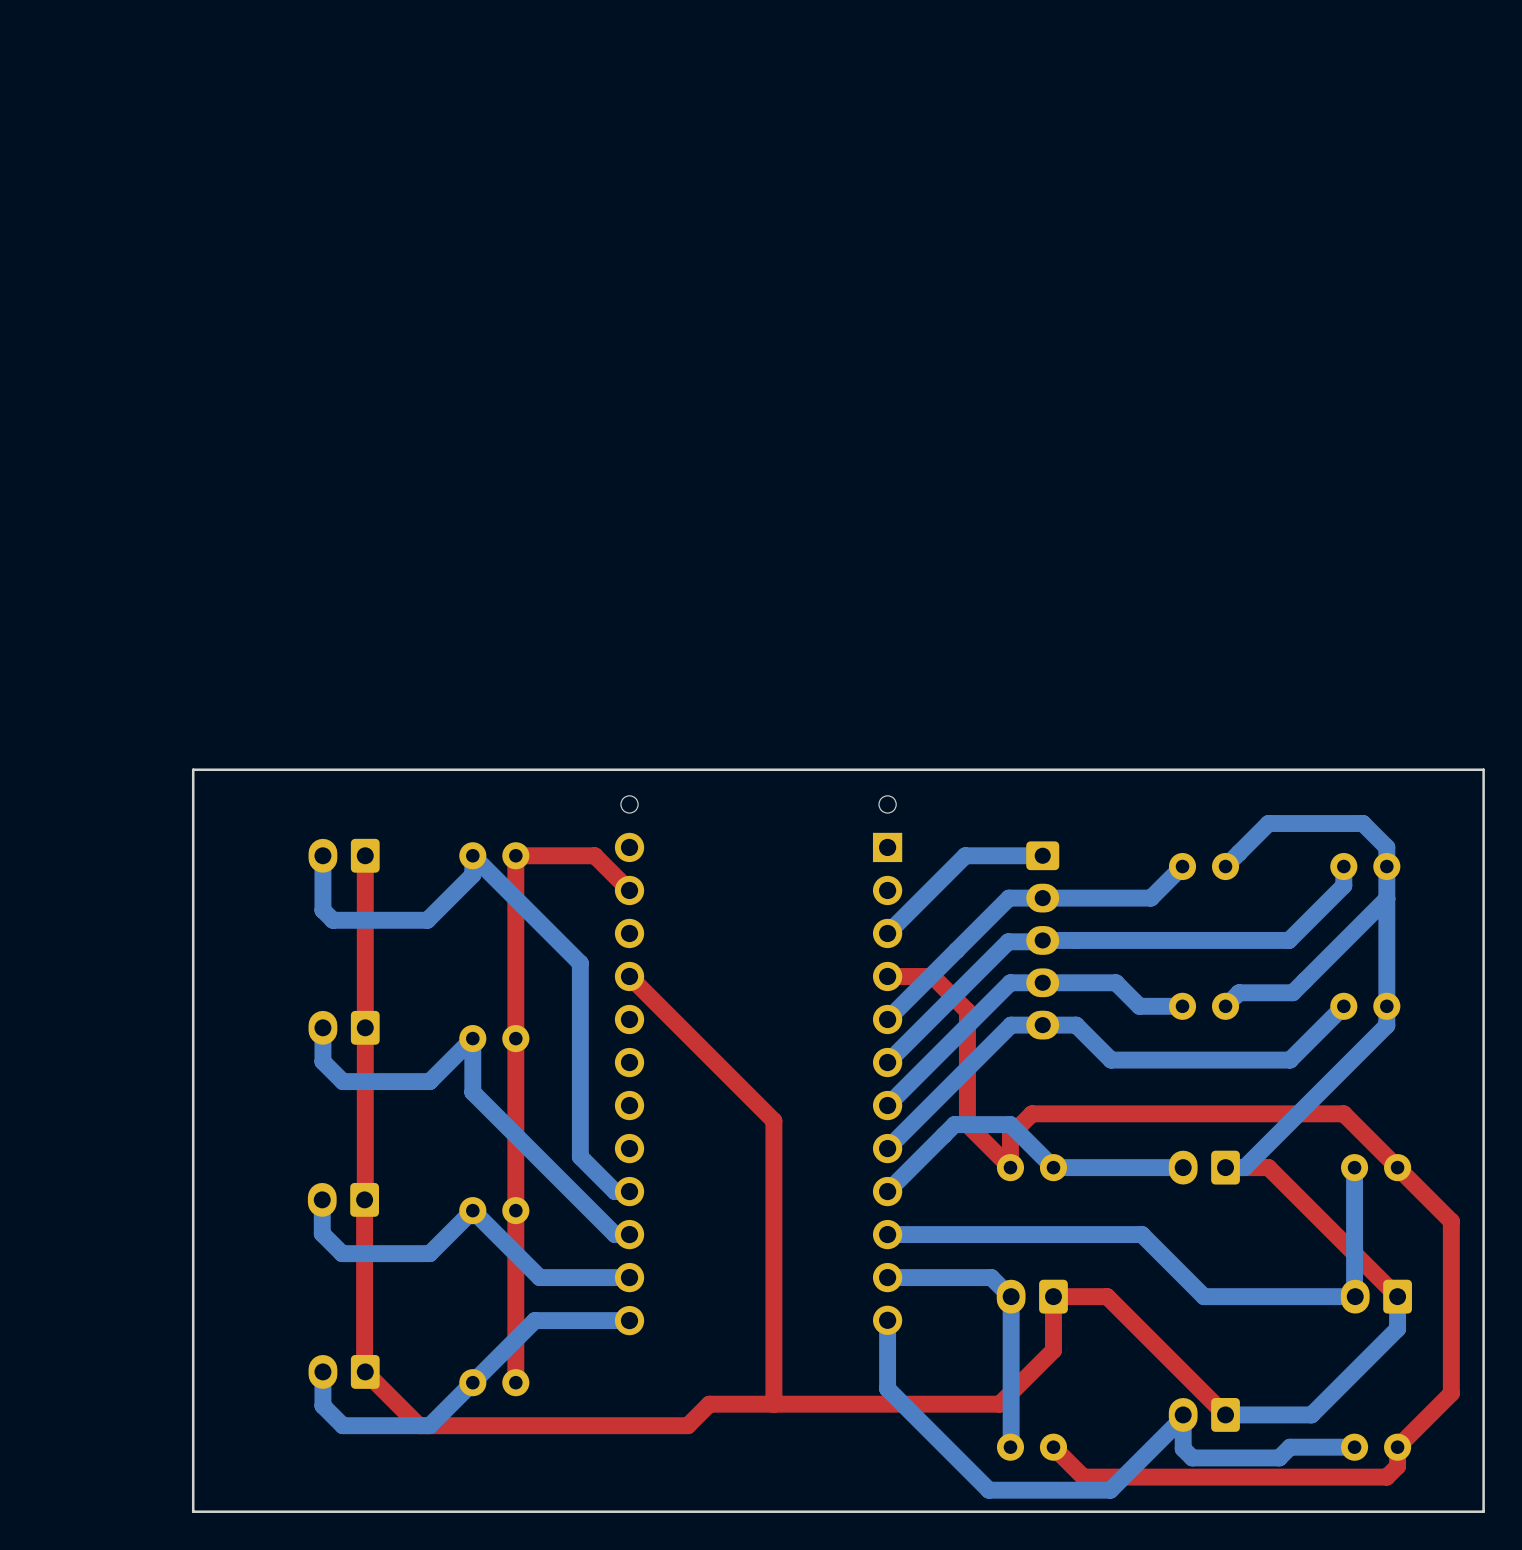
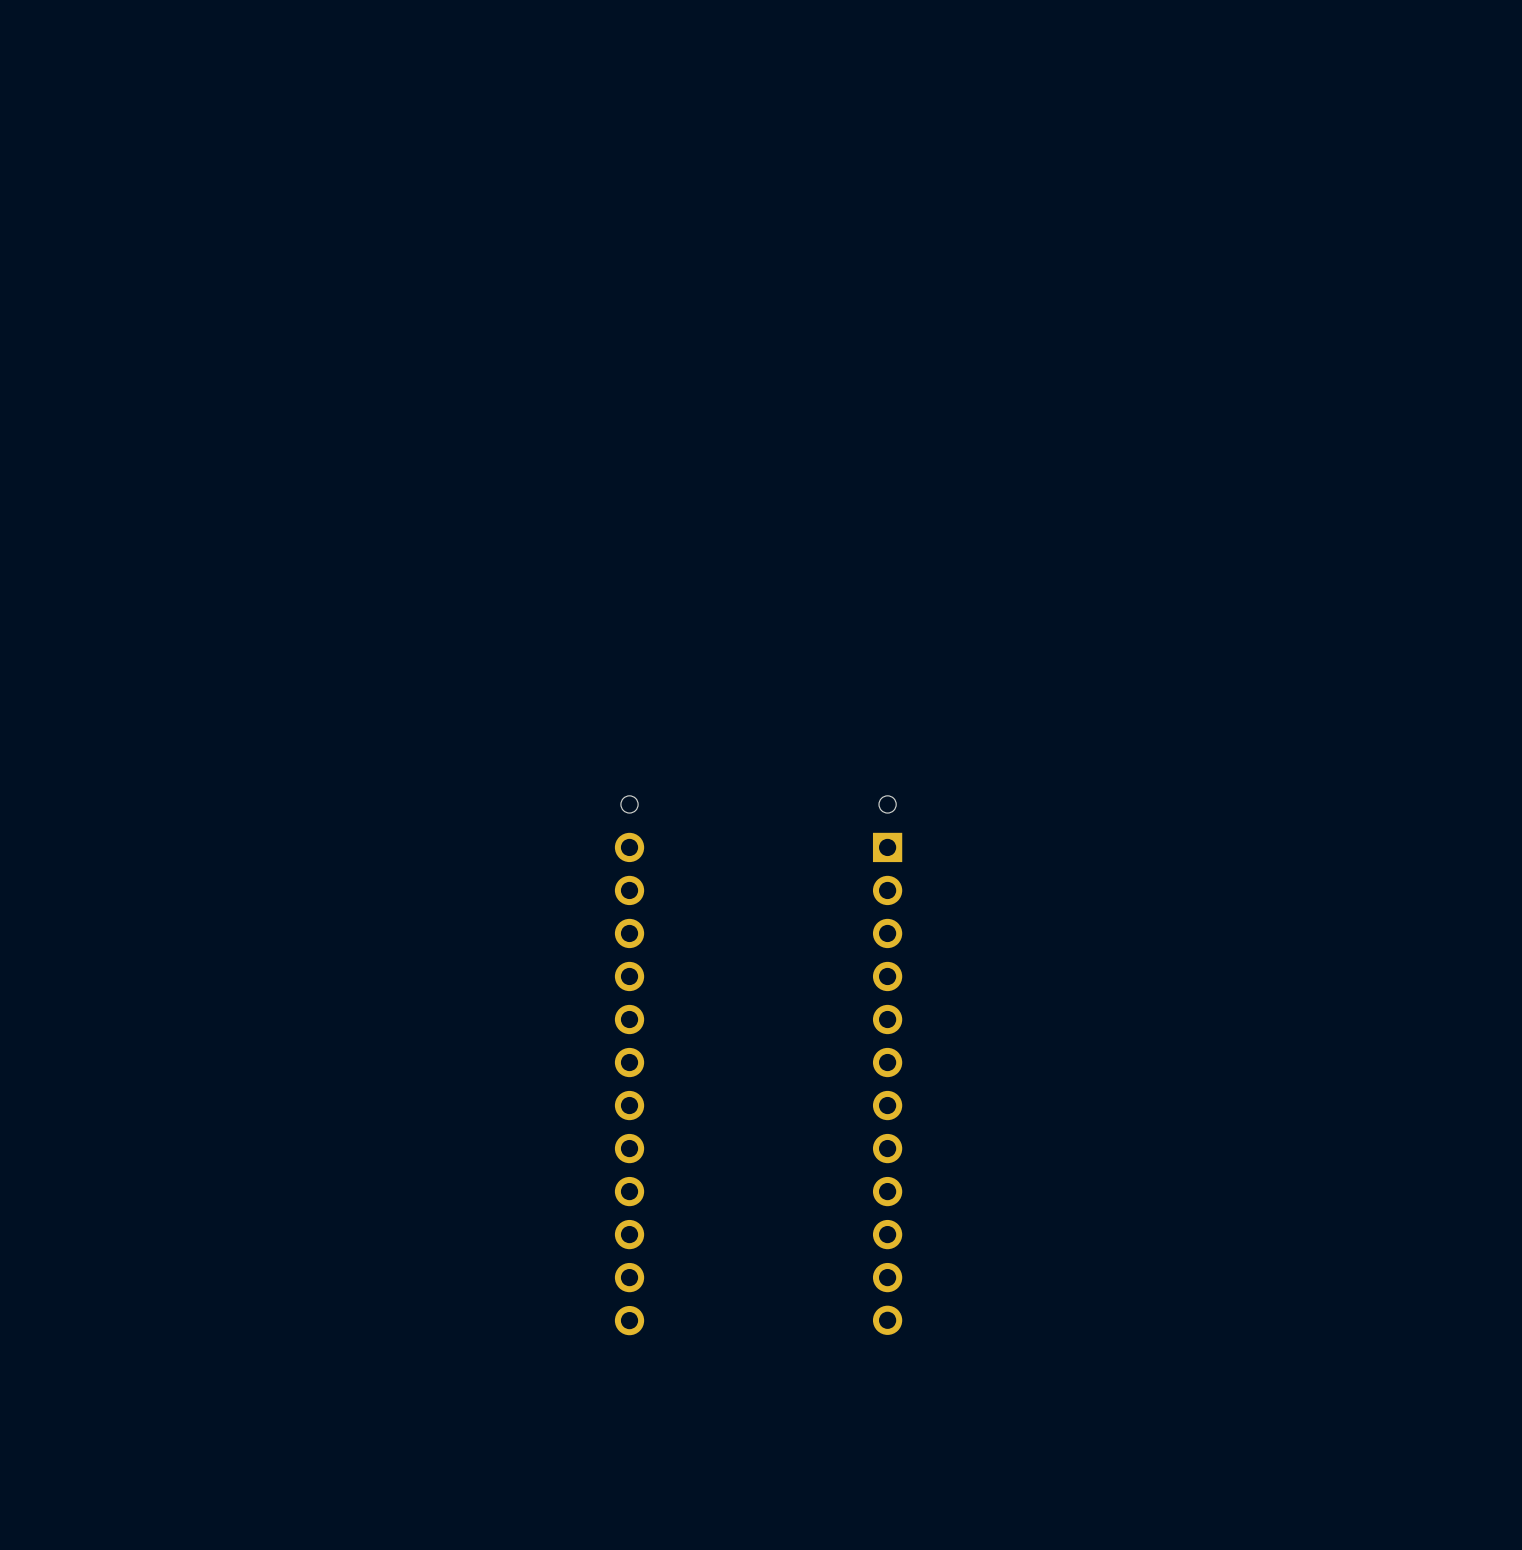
board edge: (1483, 769) (1483, 1511) (193, 1511) (193, 769) (1483, 769) -> none
bottom track: (322, 855) (322, 910) (333, 920) (427, 920) (472, 874) (472, 855) (580, 963) (580, 1156) (615, 1191) (629, 1191) -> none
part: (344, 855) -> none
top track: (365, 855) (364, 1371) (419, 1425) (687, 1425) (709, 1404) (999, 1404) (1053, 1350) (1053, 1296) (1107, 1296) (1225, 1414) -> none
part: (494, 855) -> none
bottom track: (1042, 855) (965, 855) (887, 933) -> none
bottom track: (1182, 866) (1150, 898) (1008, 898) (887, 1019) -> none
part: (1204, 866) -> none
bottom track: (1225, 866) (1268, 823) (1362, 823) (1386, 847) (1386, 1025) (1244, 1167) (1225, 1167) -> none
bottom track: (1343, 866) (1343, 885) (1289, 940) (1008, 941) (887, 1062) -> none
part: (1365, 866) -> none
top track: (629, 890) (594, 855) (515, 855) (515, 1382) -> none
bottom track: (1386, 898) (1292, 992) (1239, 992) (1225, 1006) -> none
part: (1042, 940) -> none
top track: (629, 976) (773, 1120) (773, 1404) -> none
top track: (887, 976) (932, 976) (967, 1011) (967, 1124) (1010, 1167) (1010, 1135) (1031, 1113) (1343, 1113) (1451, 1221) (1451, 1393) (1397, 1447) (1397, 1466) (1386, 1477) (1083, 1477) (1053, 1447) -> none
bottom track: (1182, 1006) (1139, 1006) (1115, 982) (1010, 982) (887, 1105) -> none
part: (1204, 1006) -> none
bottom track: (1343, 1006) (1290, 1060) (1111, 1060) (1076, 1025) (1011, 1025) (887, 1148) -> none
part: (1365, 1006) -> none
bottom track: (322, 1027) (322, 1061) (342, 1081) (429, 1081) (472, 1038) (472, 1092) (615, 1234) (629, 1234) -> none
part: (344, 1027) -> none
part: (494, 1038) -> none
part: (1031, 1167) -> none
bottom track: (1183, 1167) (1053, 1167) (1010, 1124) (954, 1124) (887, 1191) -> none
part: (1204, 1167) -> none
top track: (1225, 1167) (1268, 1167) (1397, 1296) -> none
bottom track: (1354, 1167) (1355, 1296) (1204, 1296) (1141, 1234) (887, 1234) -> none
part: (1376, 1167) -> none
bottom track: (322, 1199) (322, 1233) (342, 1253) (429, 1253) (472, 1210) (539, 1277) (629, 1277) -> none
part: (343, 1199) -> none
part: (494, 1210) -> none
bottom track: (887, 1277) (991, 1277) (1011, 1296) (1010, 1447) -> none
part: (1032, 1296) -> none
part: (1376, 1296) -> none
bottom track: (1397, 1296) (1397, 1328) (1311, 1414) (1225, 1414) -> none
bottom track: (629, 1320) (534, 1320) (429, 1425) (342, 1425) (322, 1405) (322, 1371) -> none
bottom track: (887, 1320) (887, 1388) (988, 1490) (1110, 1490) (1183, 1417) -> none
part: (344, 1371) -> none
part: (494, 1382) -> none
bottom track: (1183, 1414) (1183, 1448) (1192, 1457) (1279, 1457) (1290, 1447) (1354, 1447) -> none
part: (1204, 1414) -> none
part: (1031, 1447) -> none
part: (1376, 1447) -> none

